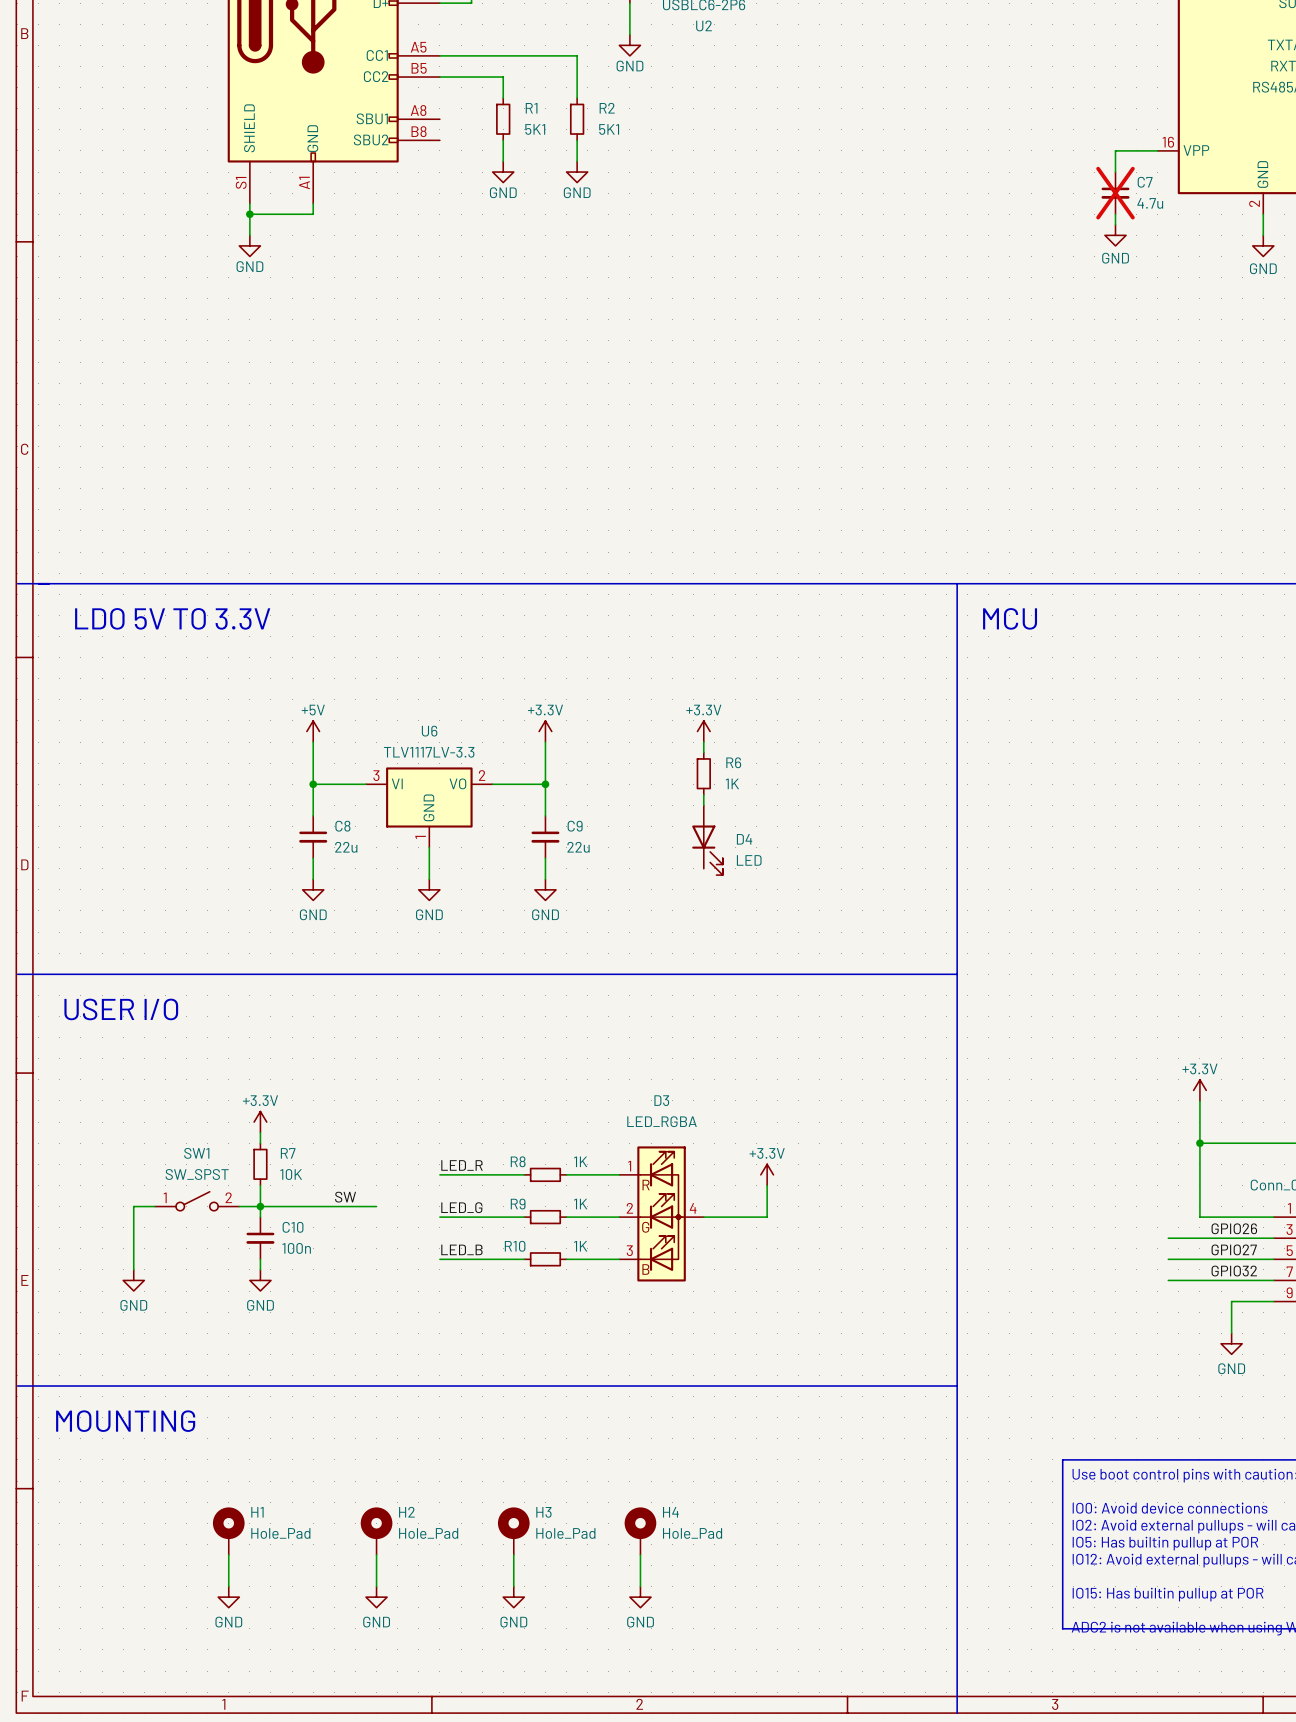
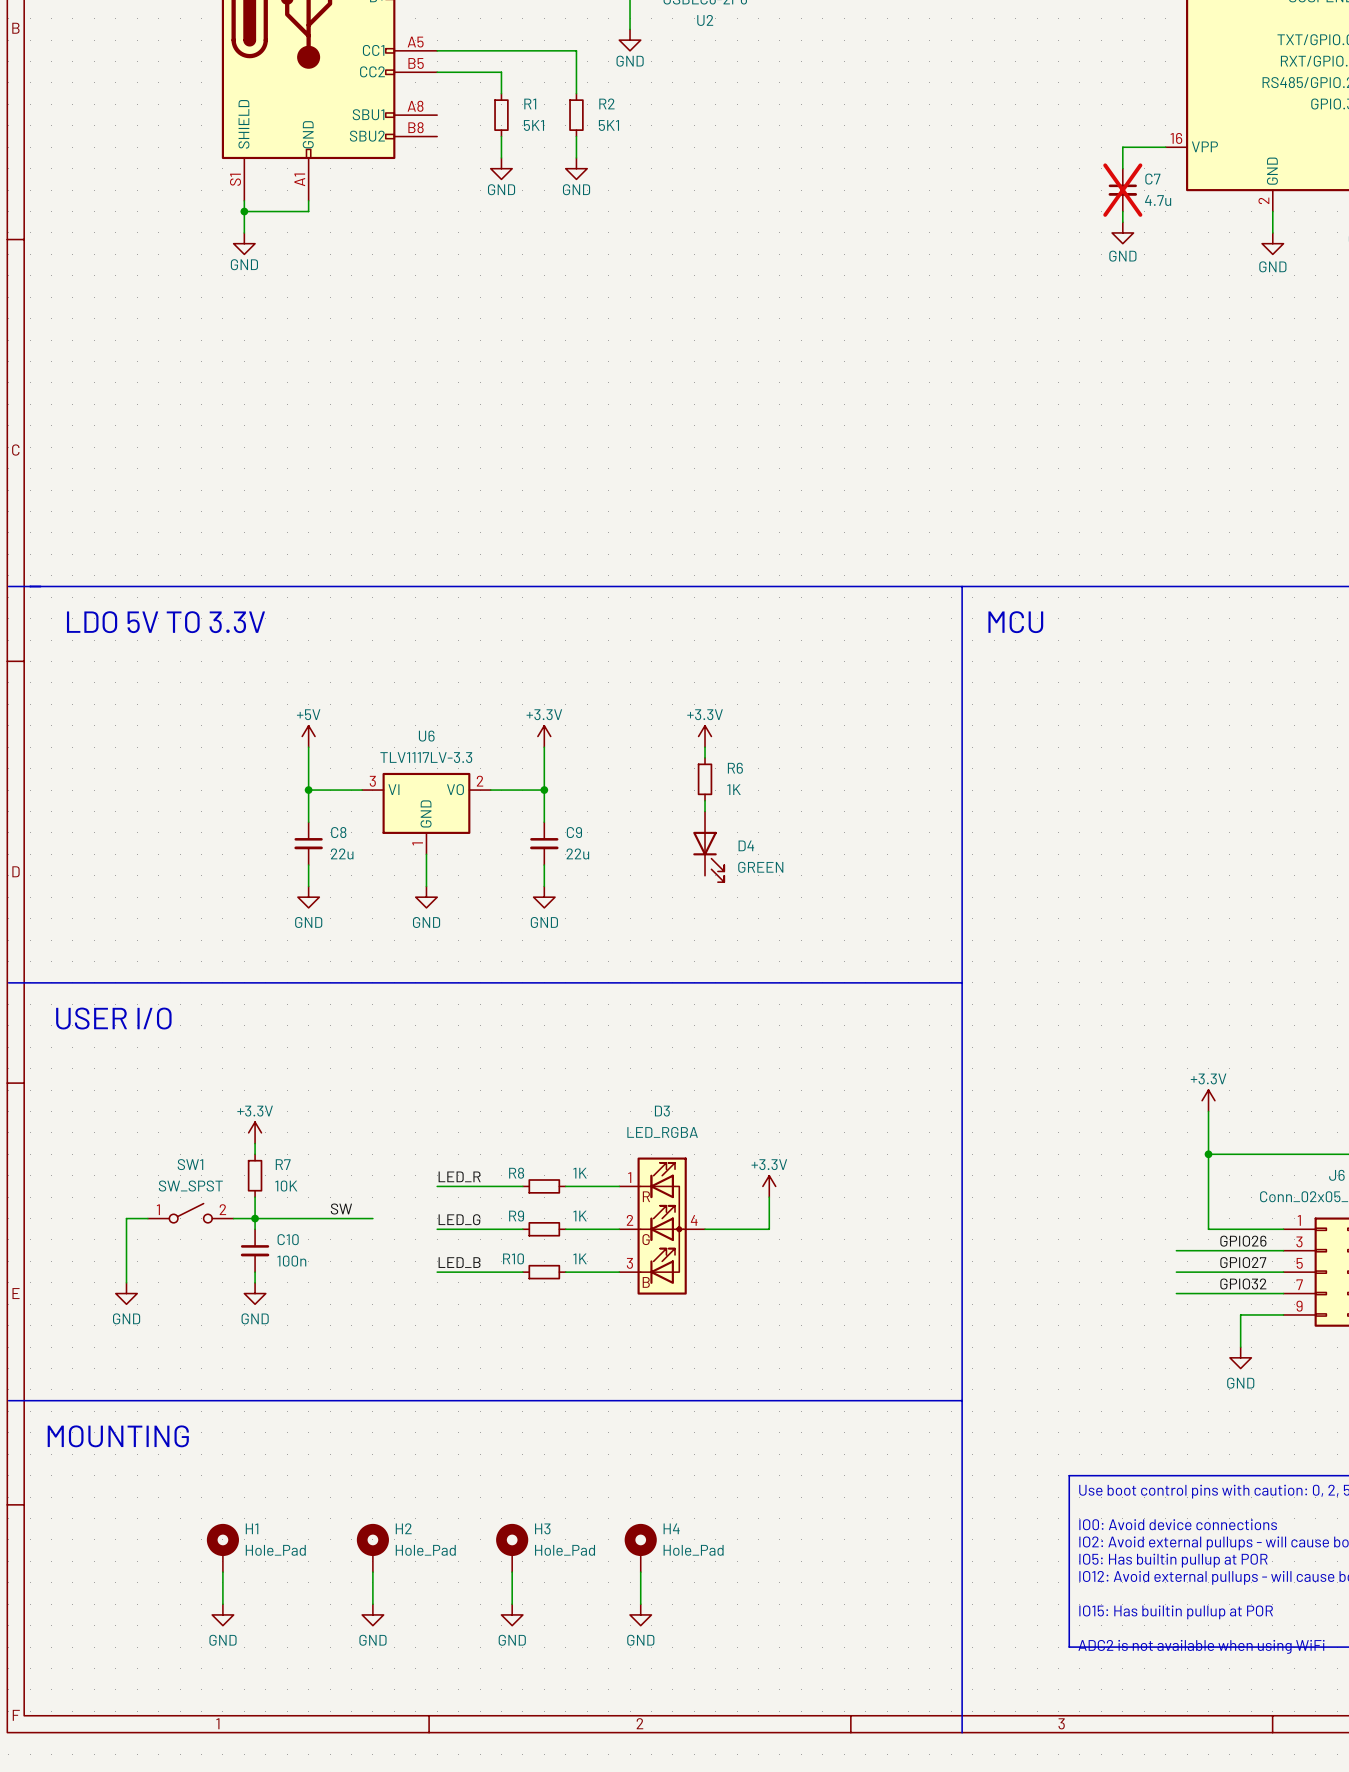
D4 value: LED (749, 860) -> GREEN (760, 867)

